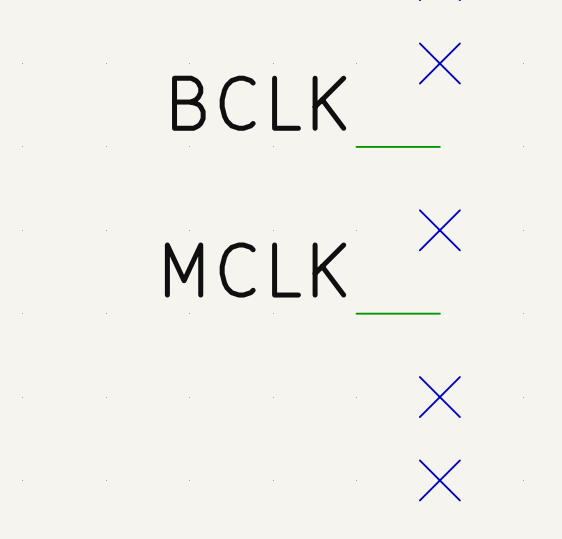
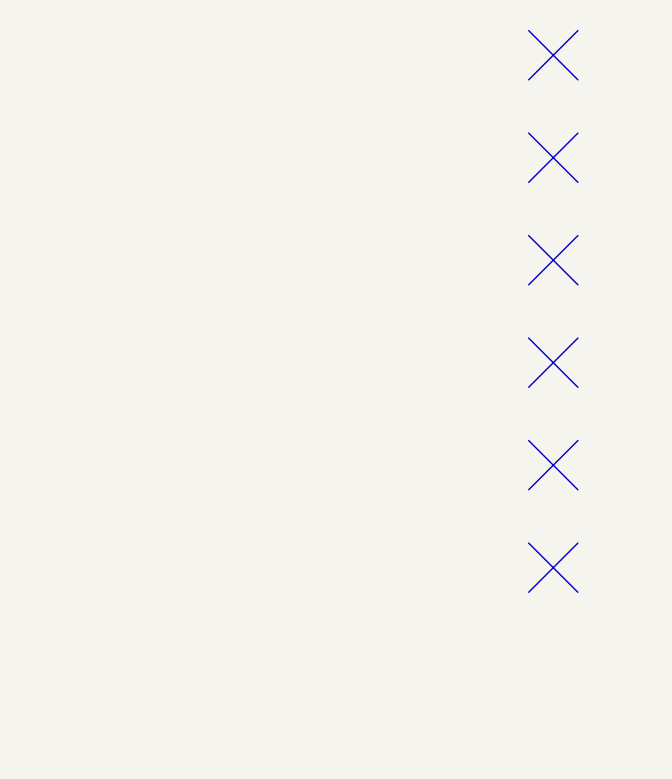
label: BCLK (259, 103) -> none
wire: (356, 146) (439, 146) -> none
no-connect mark: none -> (553, 157)
label: MCLK (255, 270) -> none
wire: (356, 313) (439, 313) -> none
no-connect mark: none -> (553, 362)

